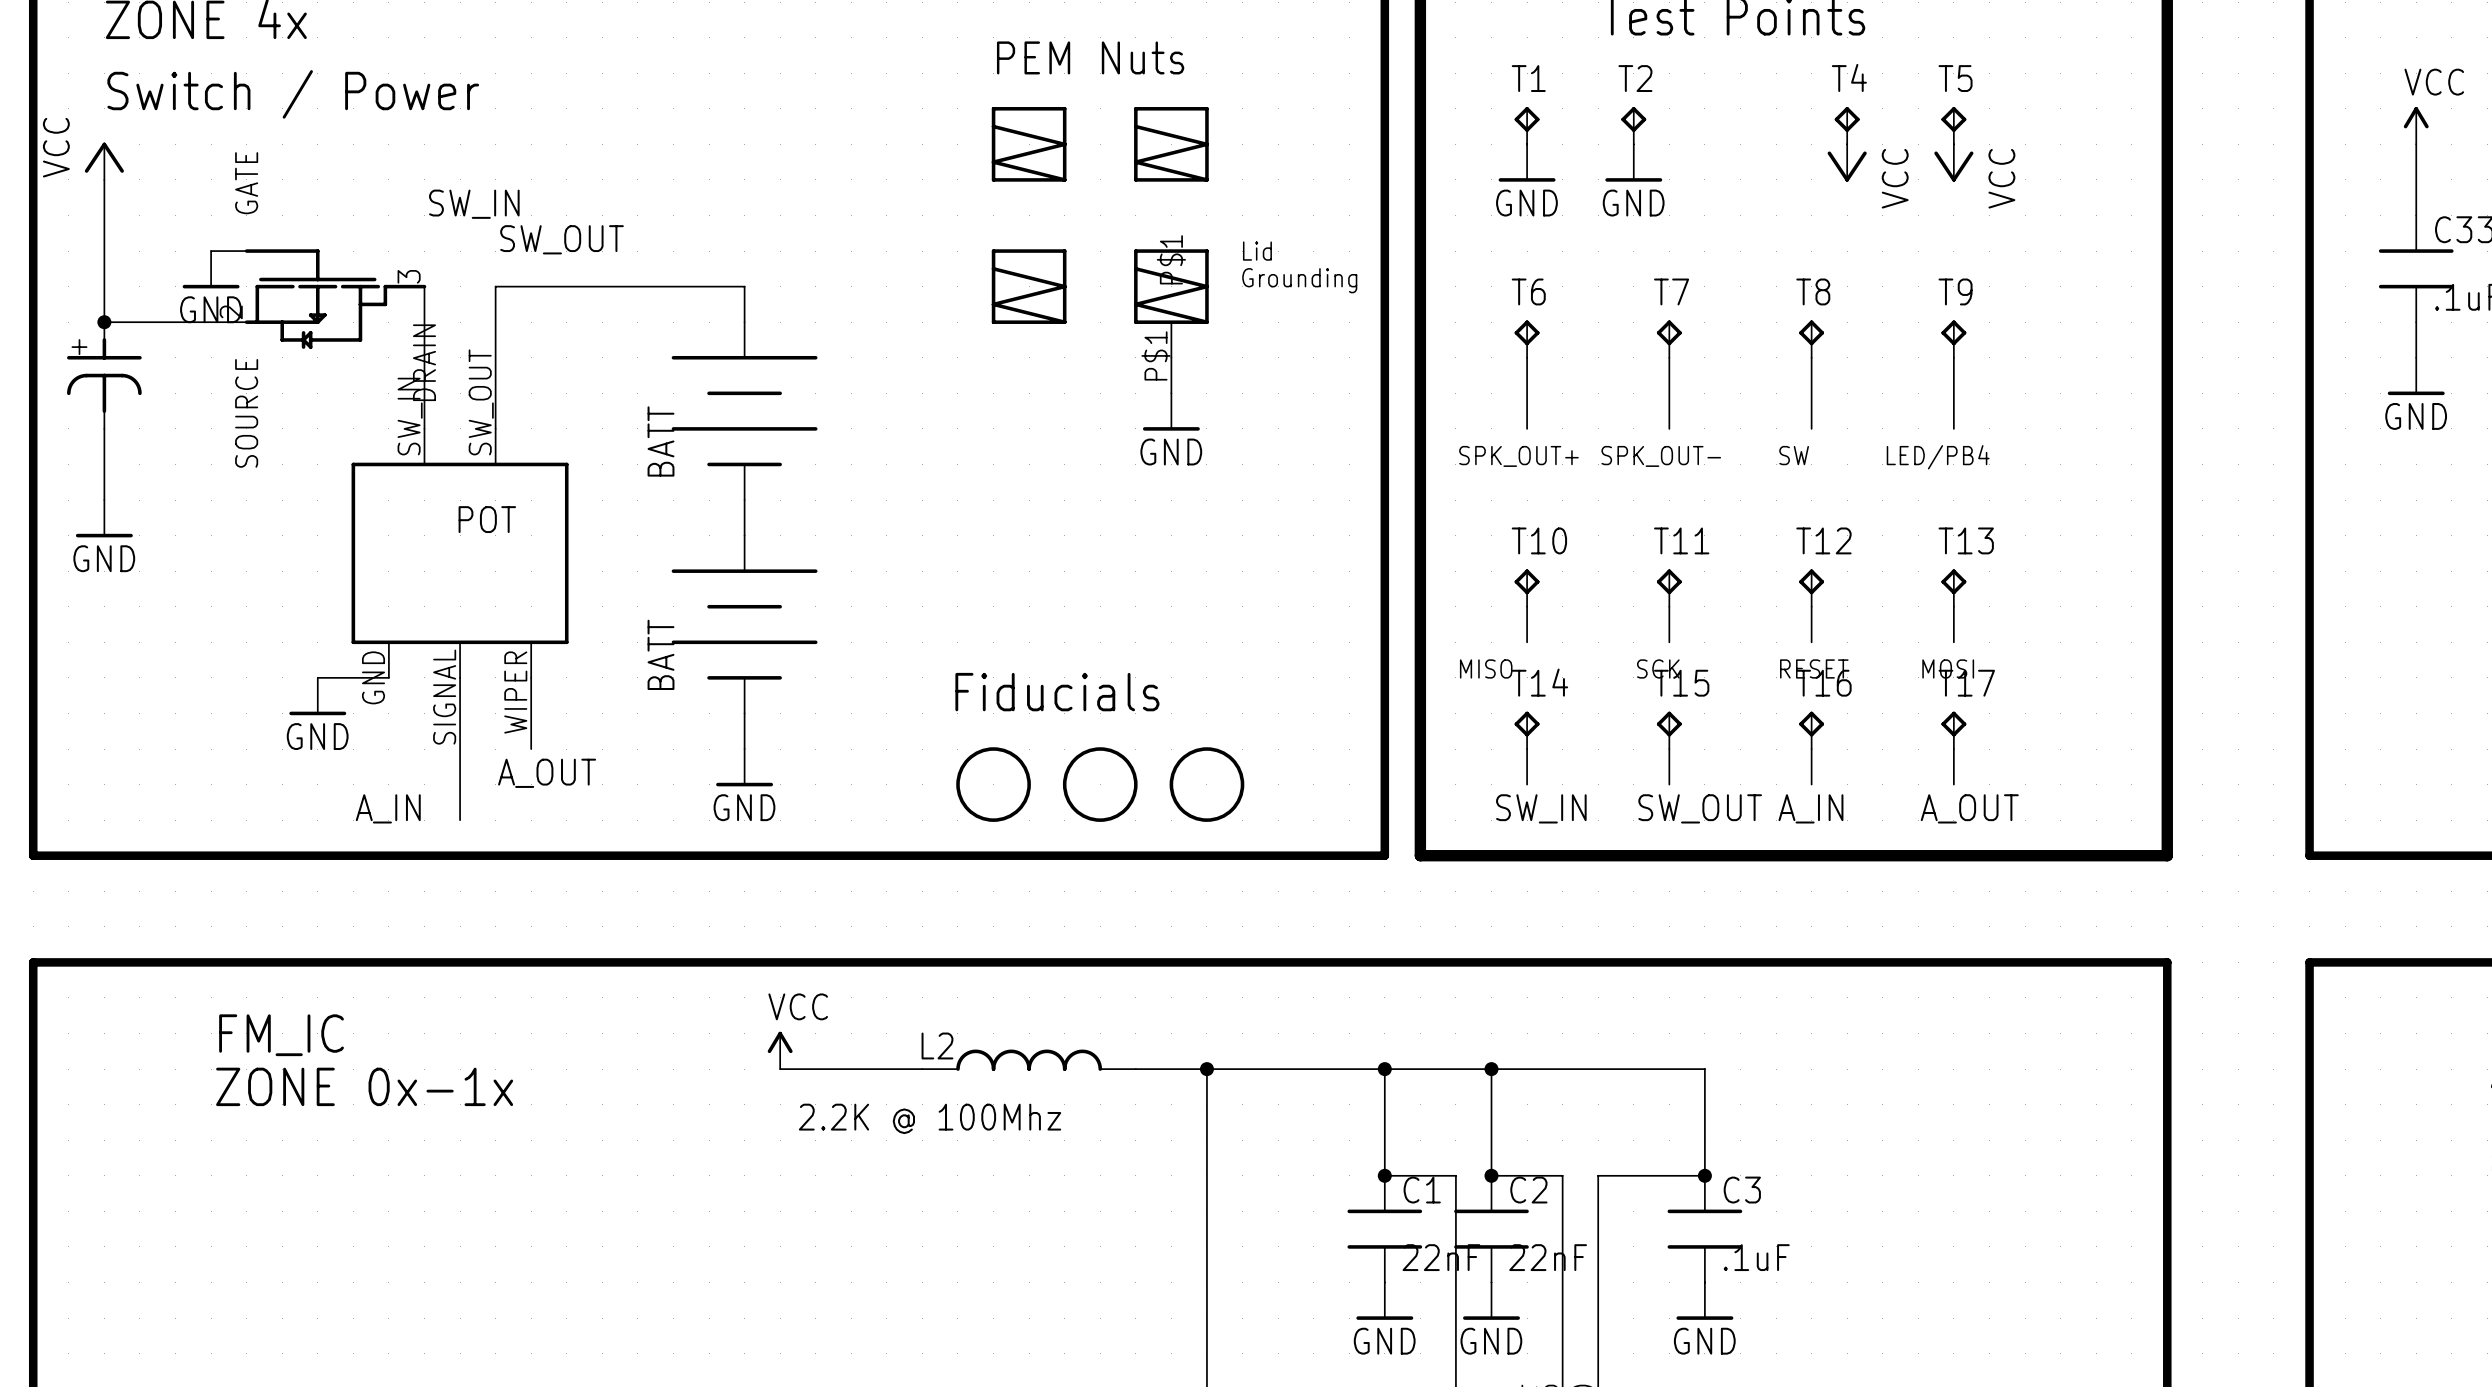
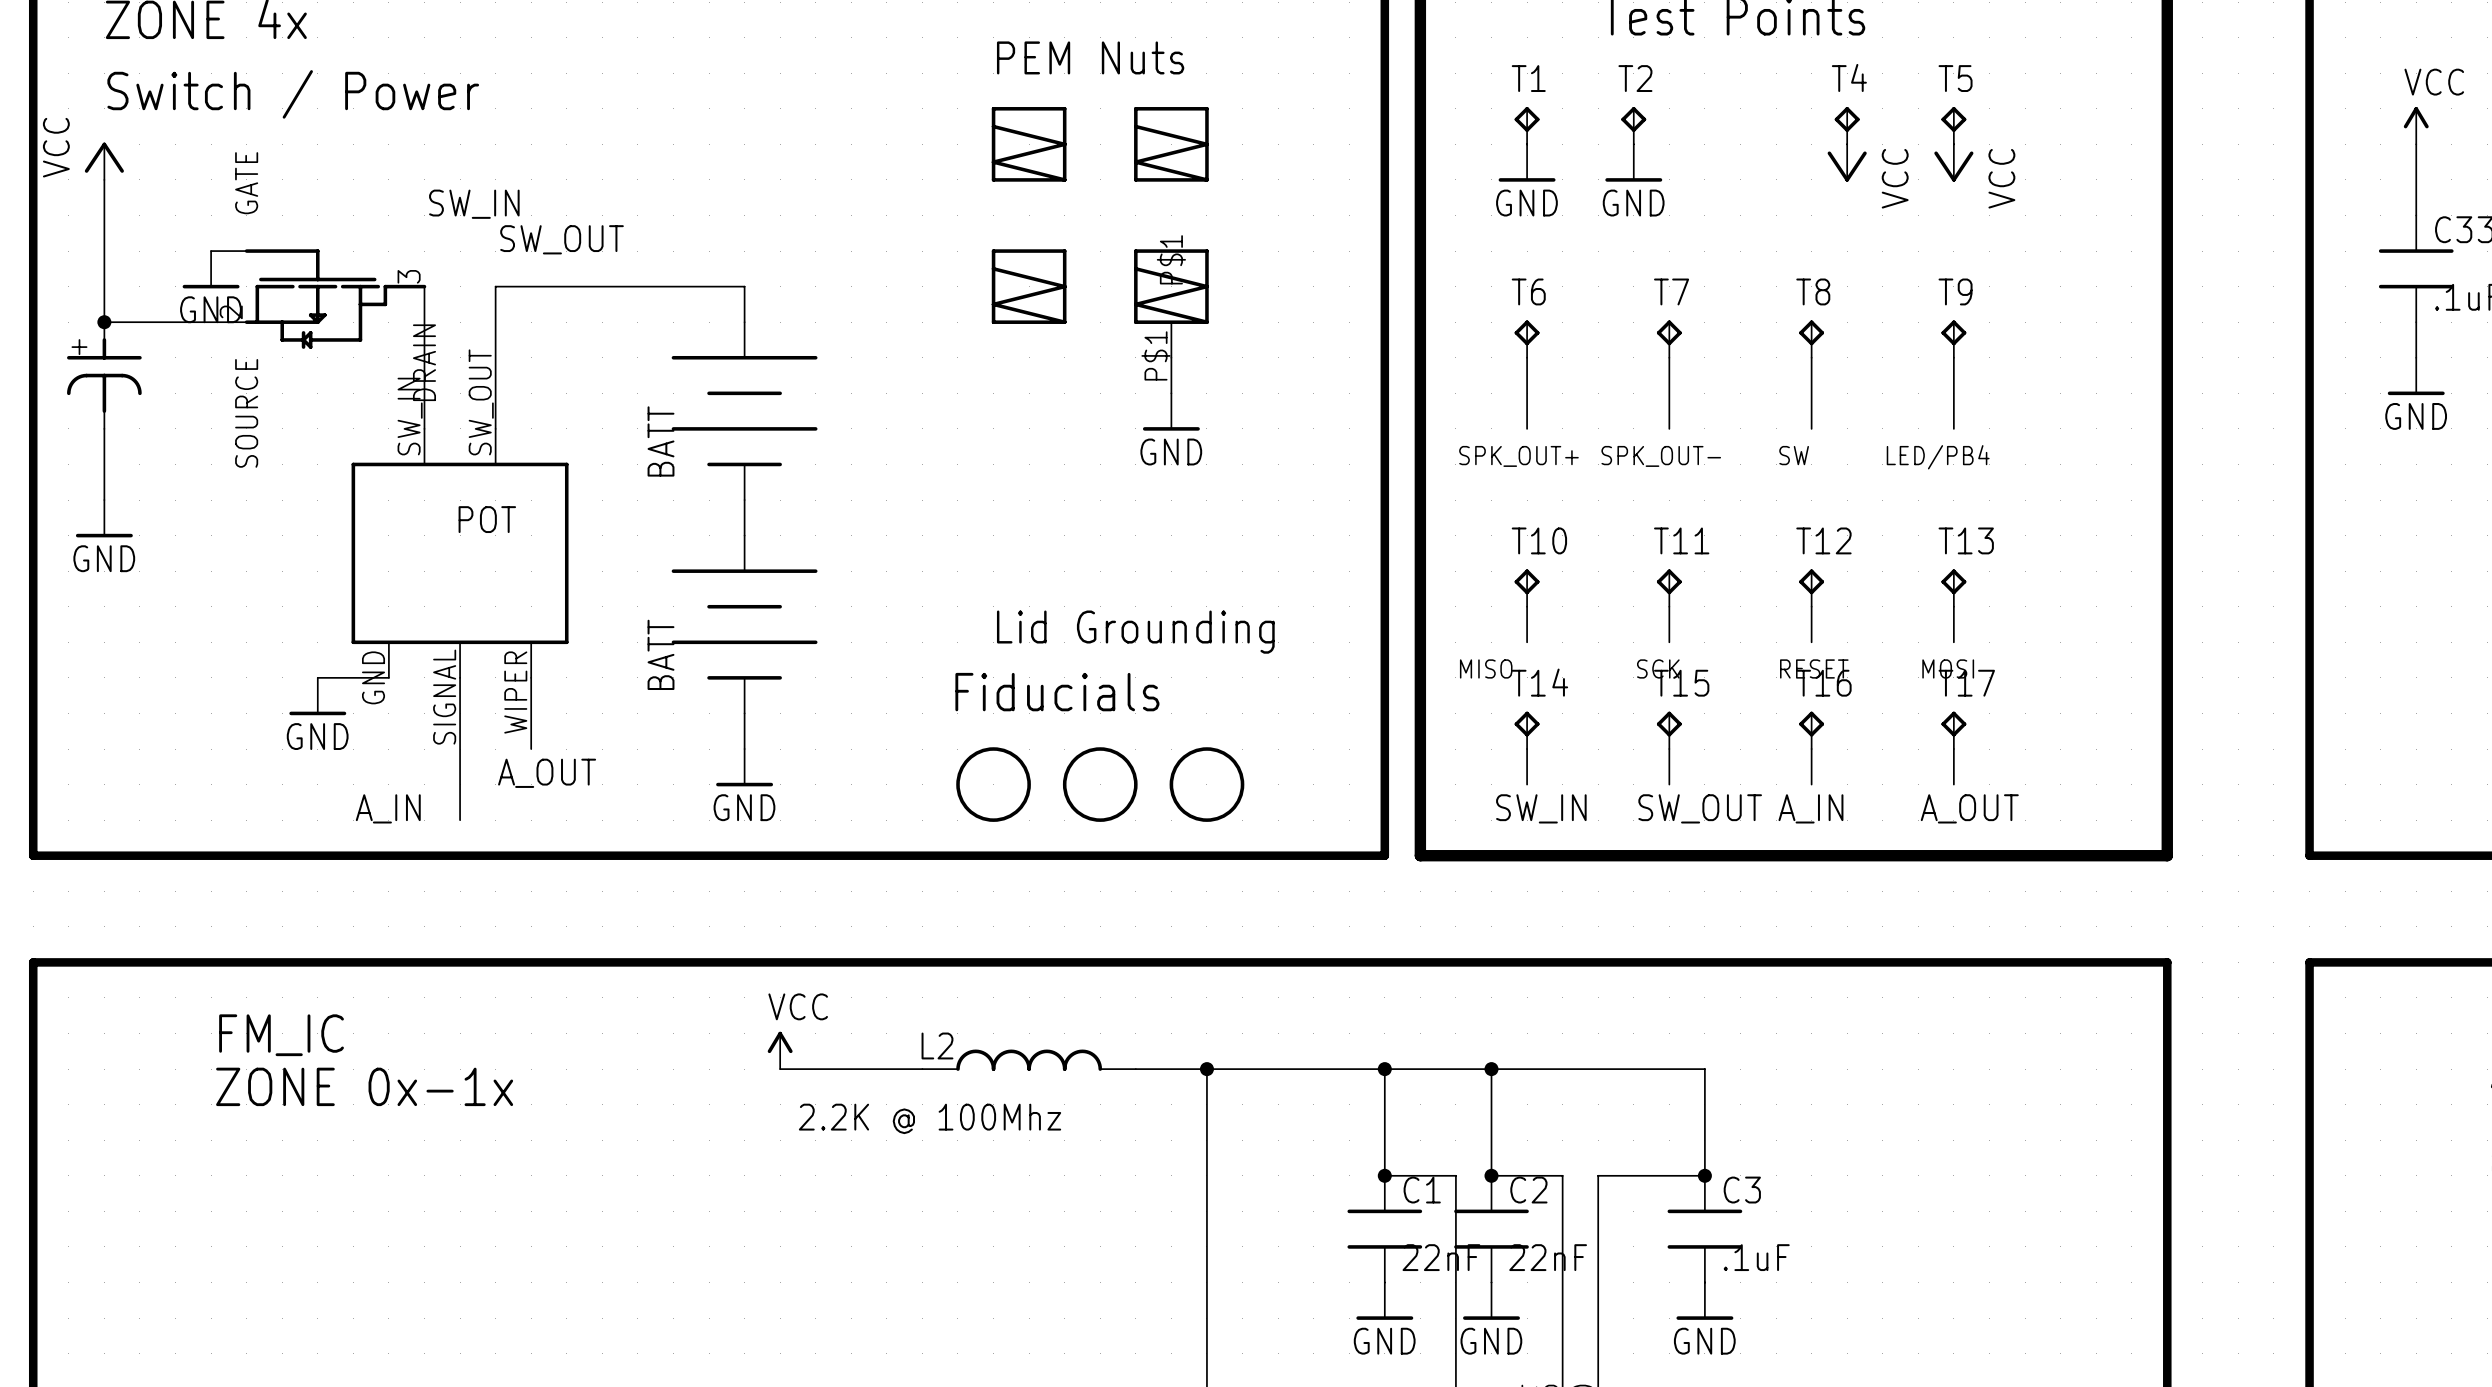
text: Lid (1257, 251) -> none
text: Grounding (1299, 280) -> none
text: none -> Lid Grounding (1135, 632)

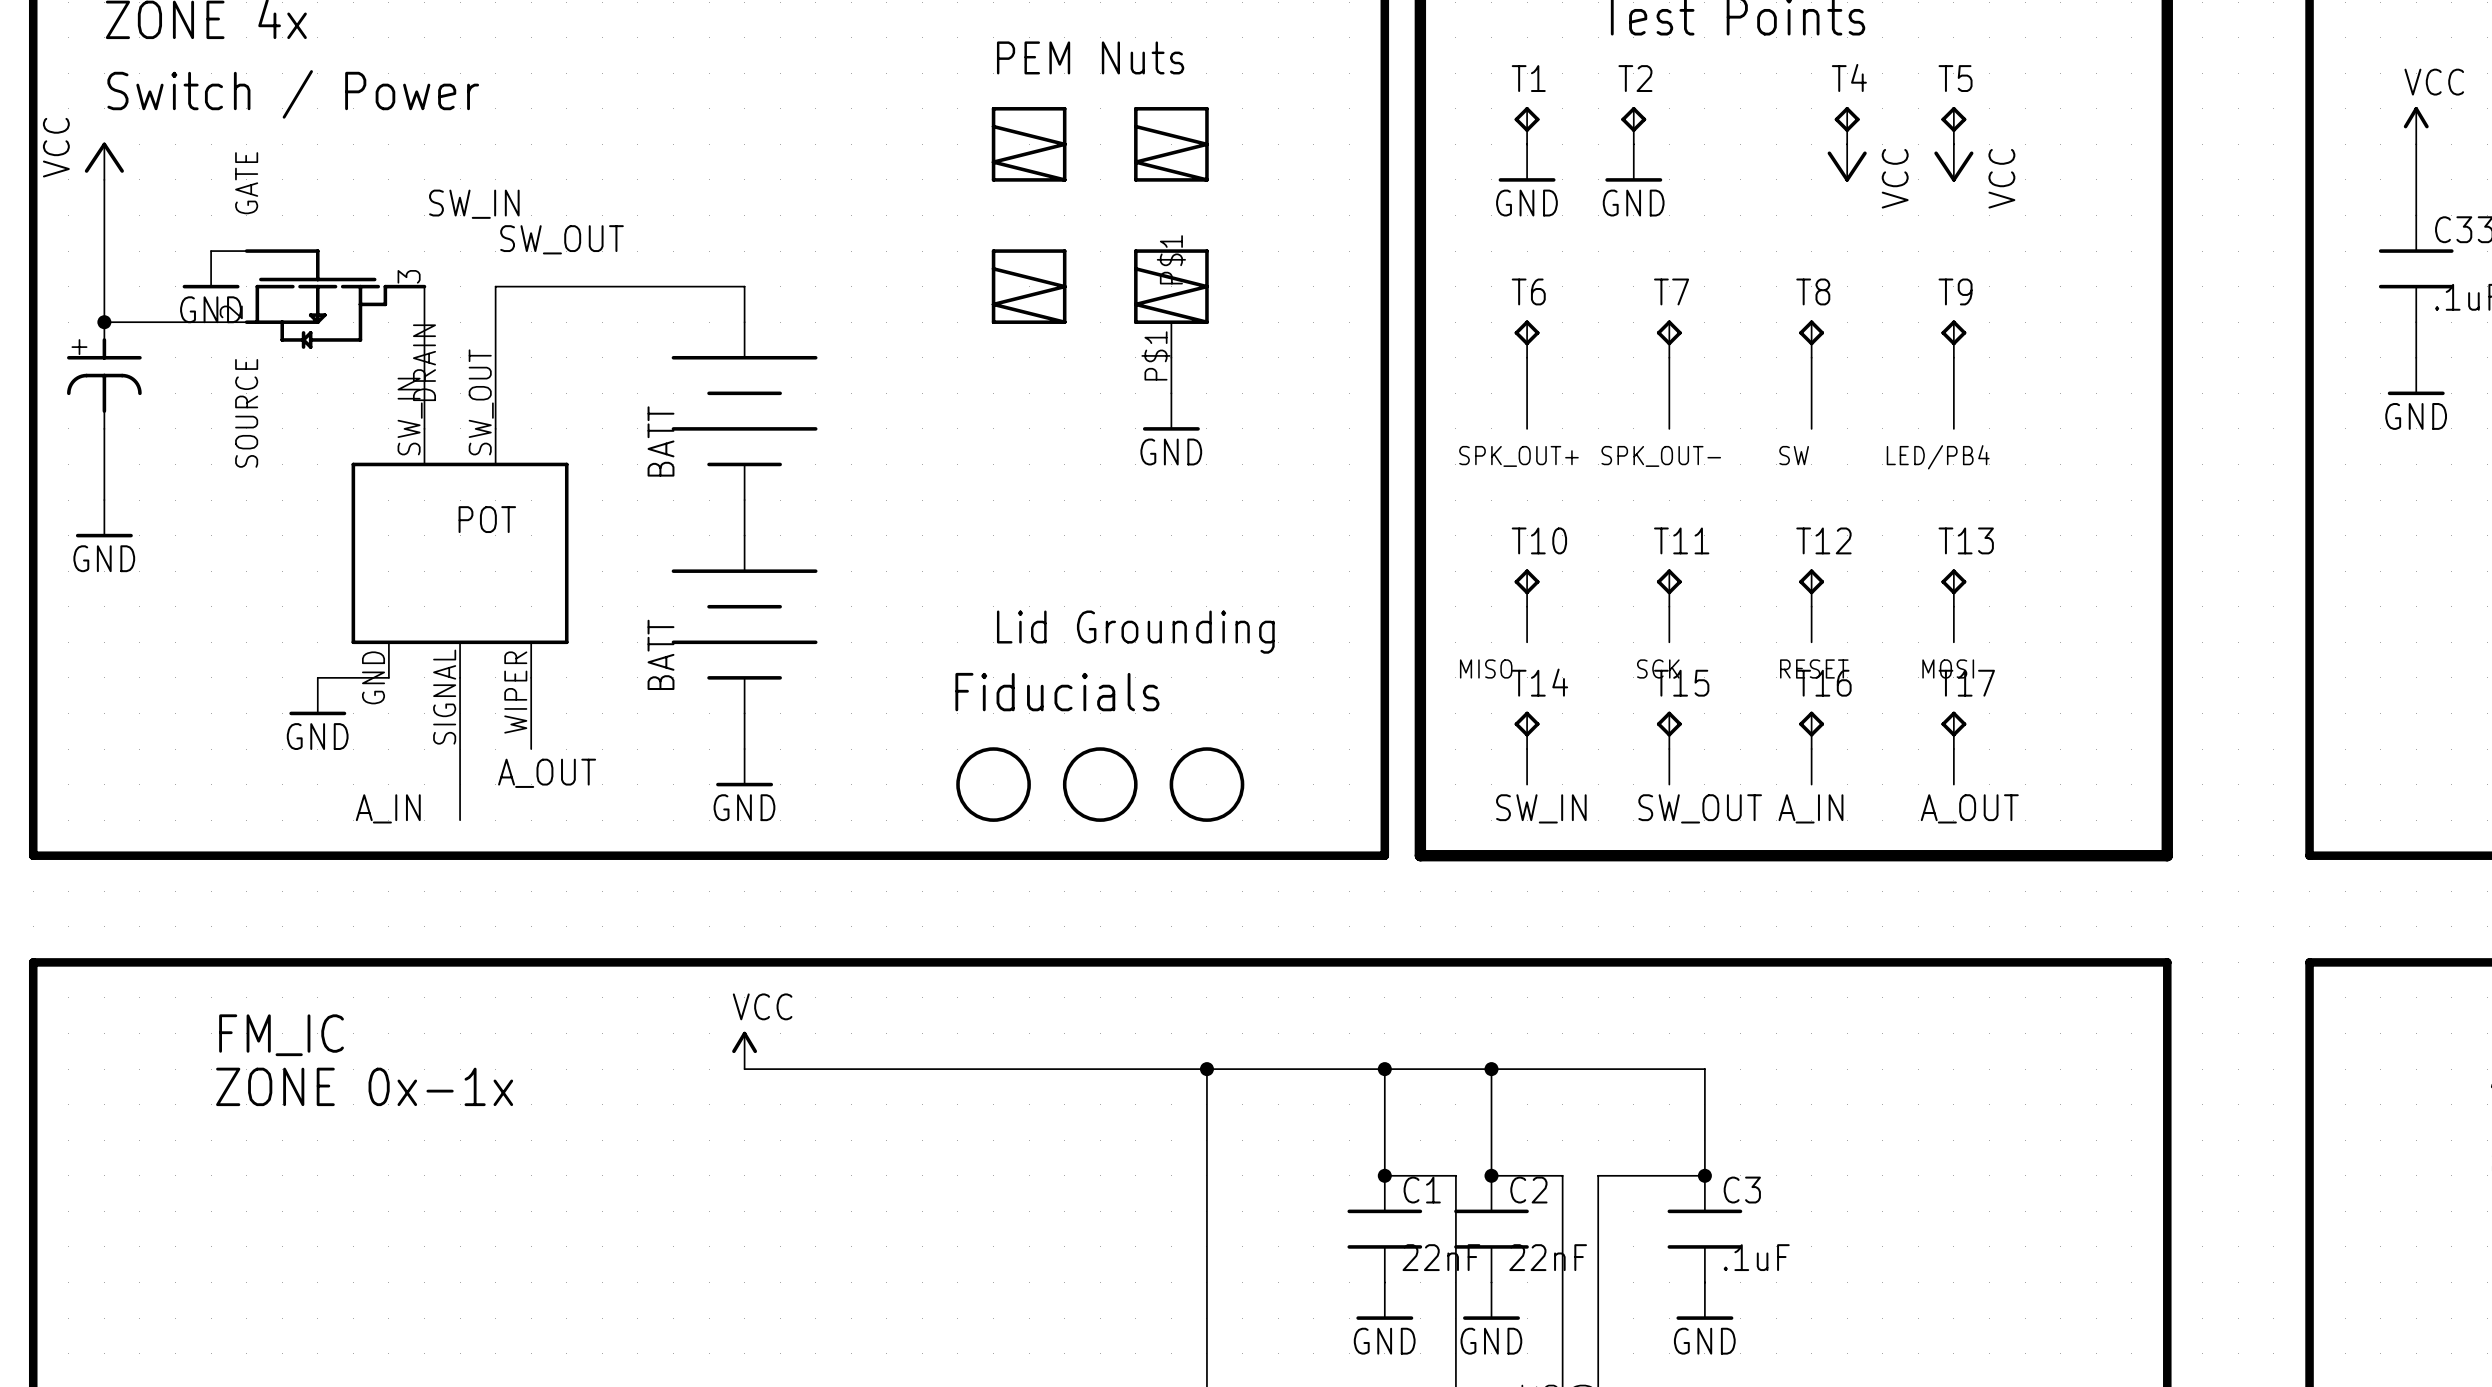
power symbol position: VCC (780, 1050) -> VCC (744, 1050)
L2: 2.2K @ 100Mhz (1029, 1060) -> none
wire: none -> (744, 1069) (780, 1069)
wire: none -> (922, 1069) (1135, 1069)

